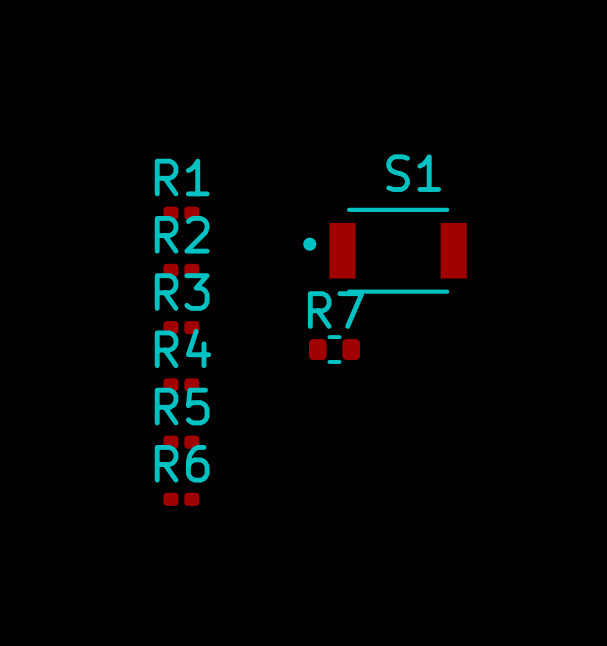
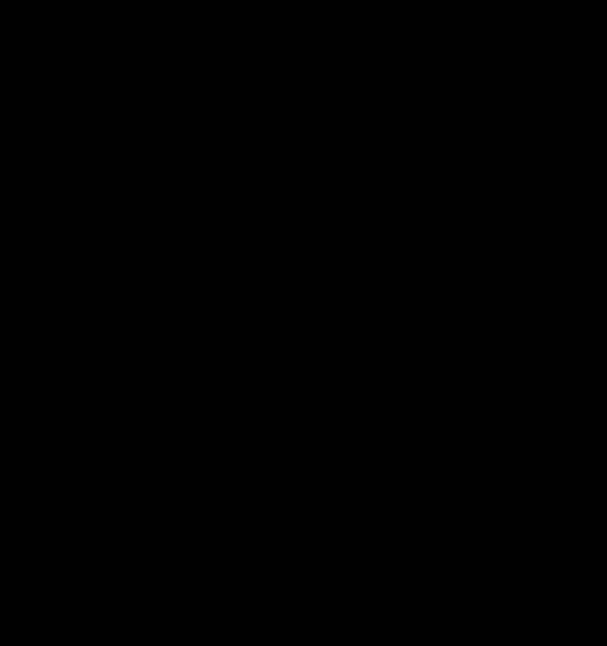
R1: (181, 213) -> none
S1: (385, 250) -> none
R2: (181, 270) -> none
R3: (181, 327) -> none
R7: (334, 349) -> none
R4: (181, 384) -> none
R5: (181, 442) -> none
R6: (181, 499) -> none

